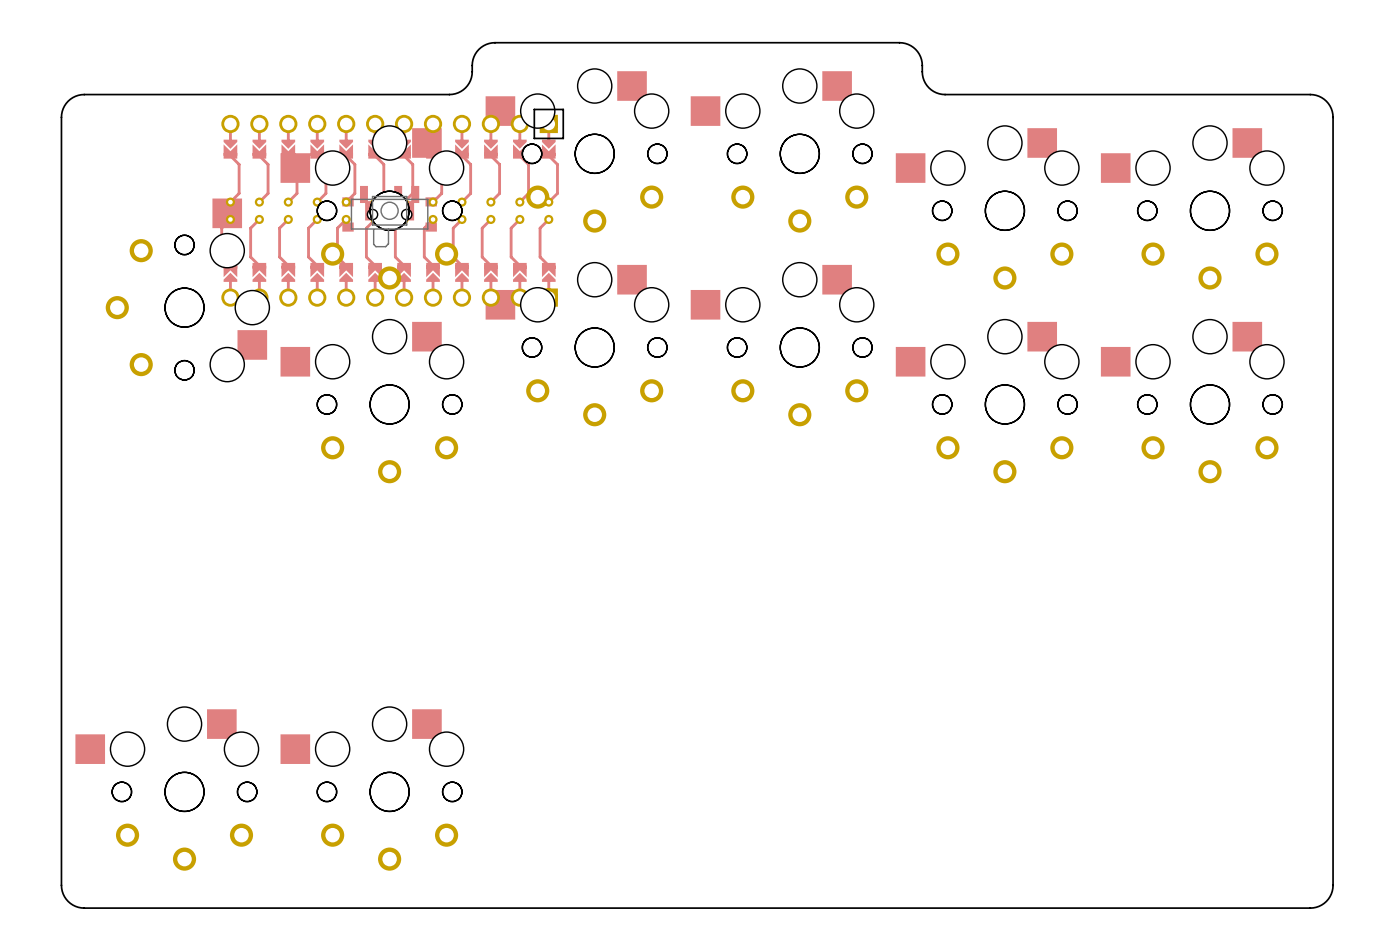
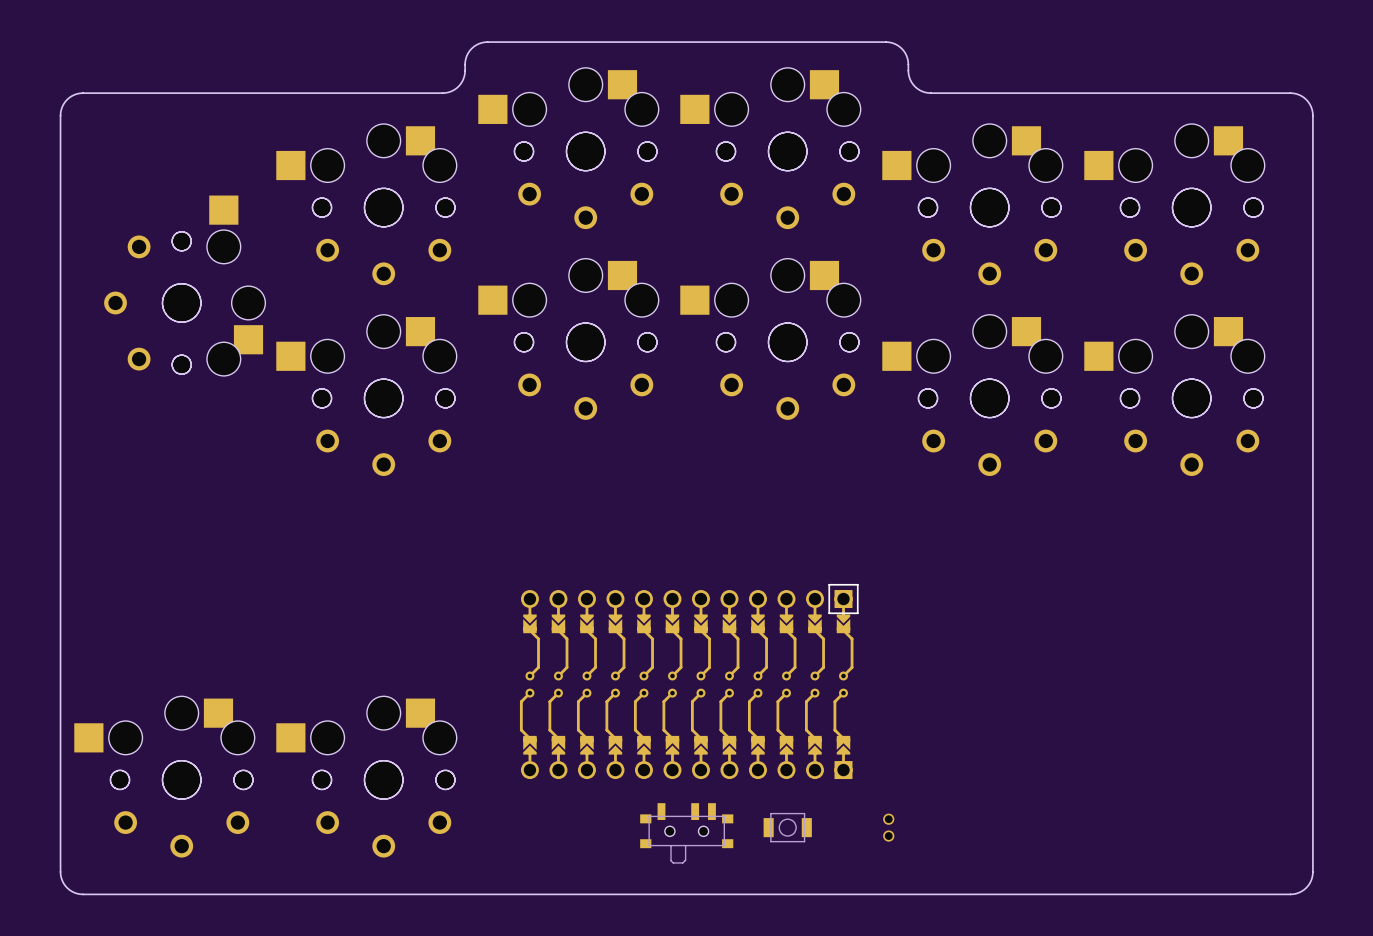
part: (392, 207) -> none
part: (389, 210) -> none
part: (389, 216) -> none
part: none -> (689, 681)
part: none -> (787, 827)
part: none -> (888, 827)
part: none -> (686, 833)

